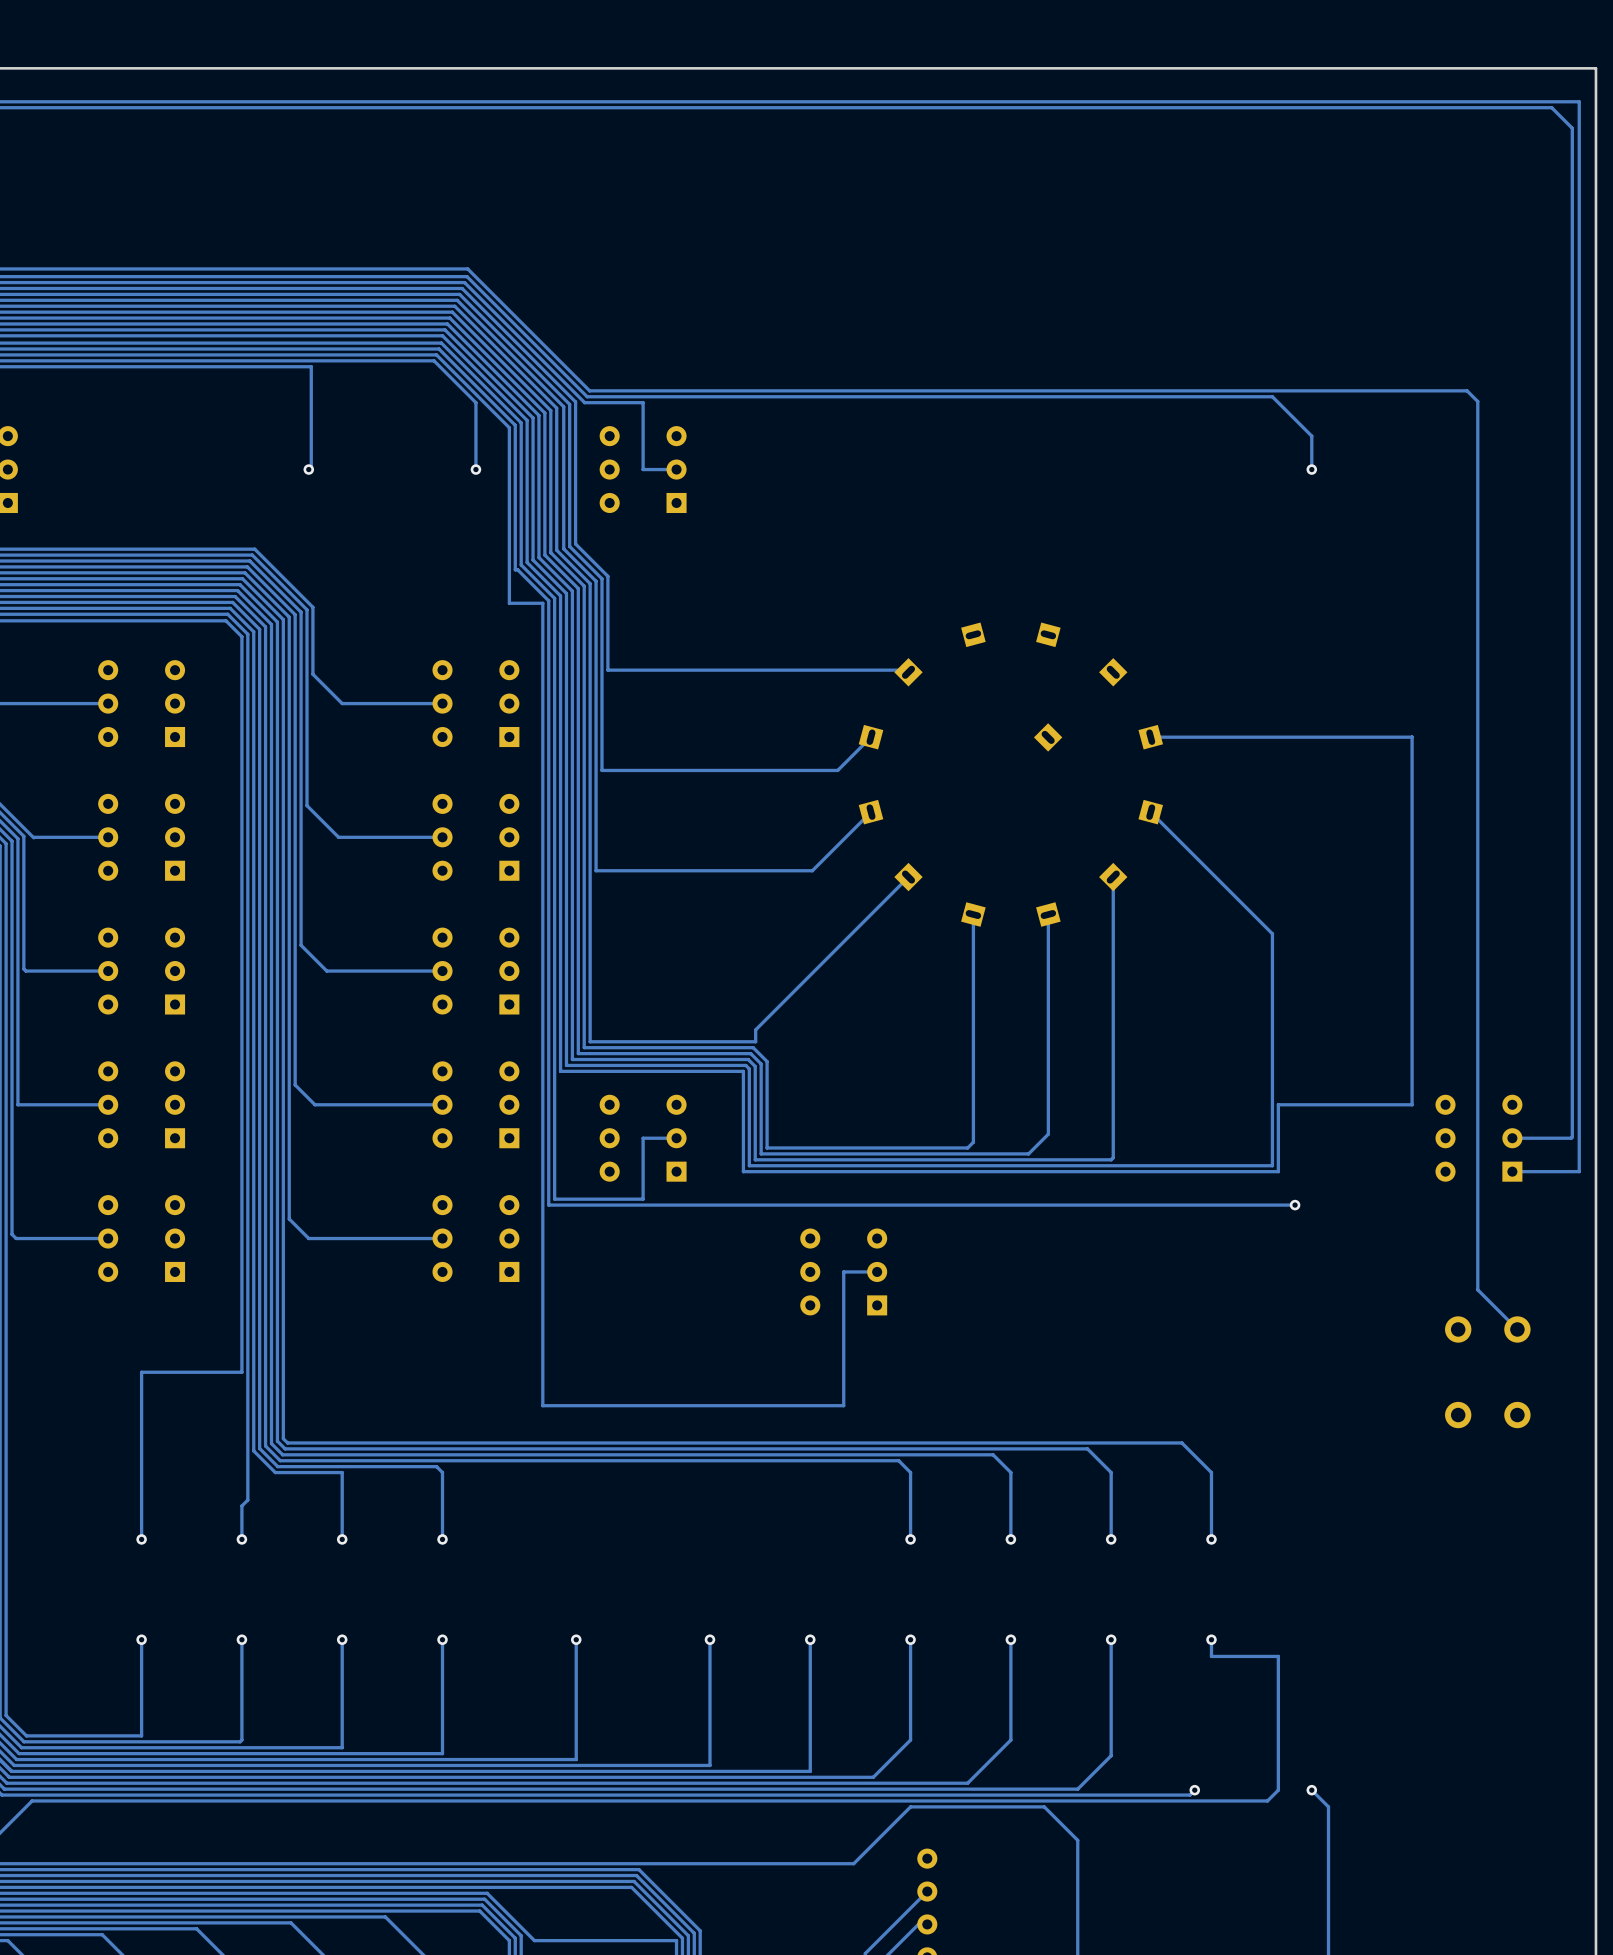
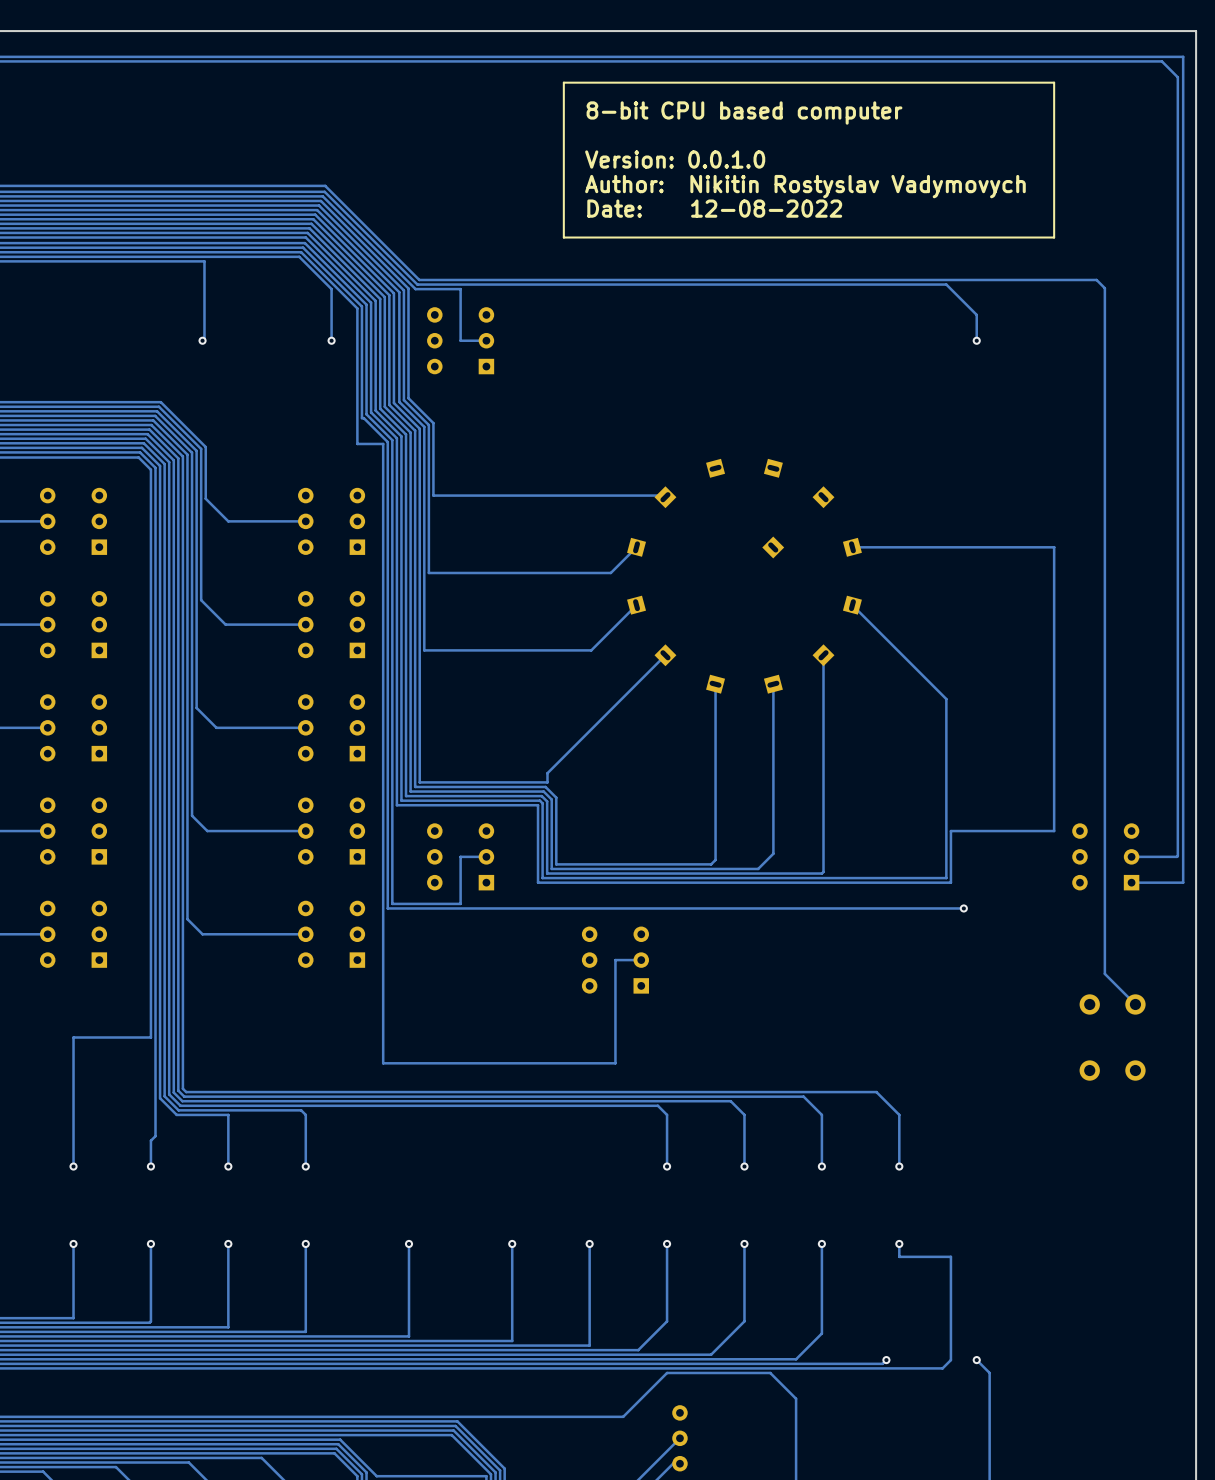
line: none -> (1054, 82) (563, 82) (563, 237) (1054, 237) (1054, 82)
text: none -> 8-bit CPU based computer (744, 112)
text: none -> Version: 0.0.1.0 (675, 159)
text: none -> Author: Nikitin Rostyslav Vadymovych (805, 186)
text: none -> Date: 12-08-2022 (714, 208)

